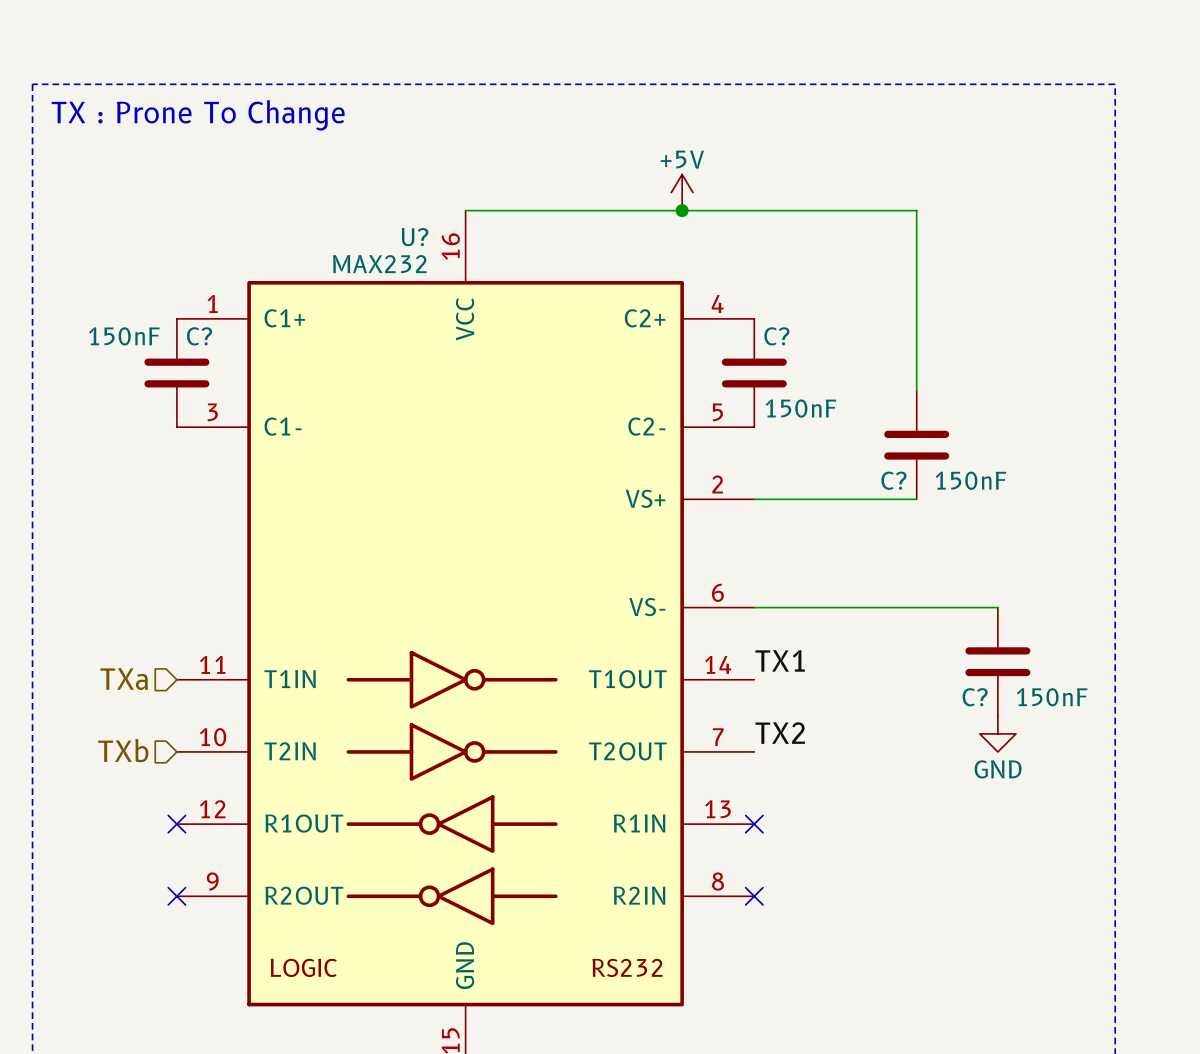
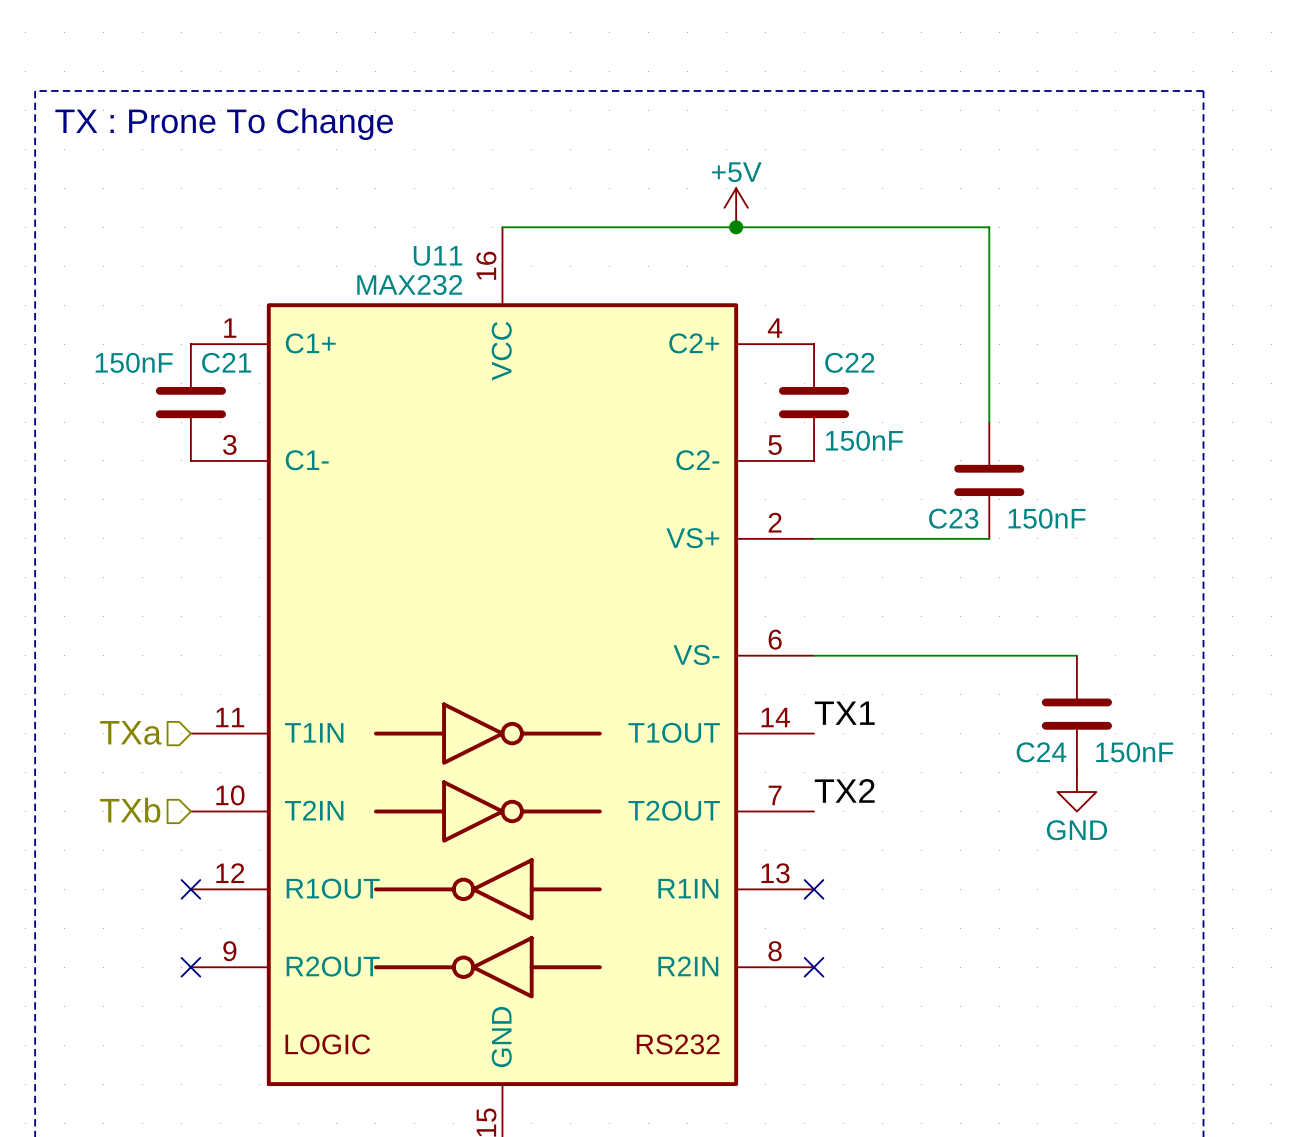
U? name: U? (414, 237) -> U11 (437, 255)
C? name: C? (199, 336) -> C21 (226, 362)
C? name: C? (776, 336) -> C22 (849, 362)
C? name: C? (893, 480) -> C23 (953, 518)
C? name: C? (975, 697) -> C24 (1041, 752)

